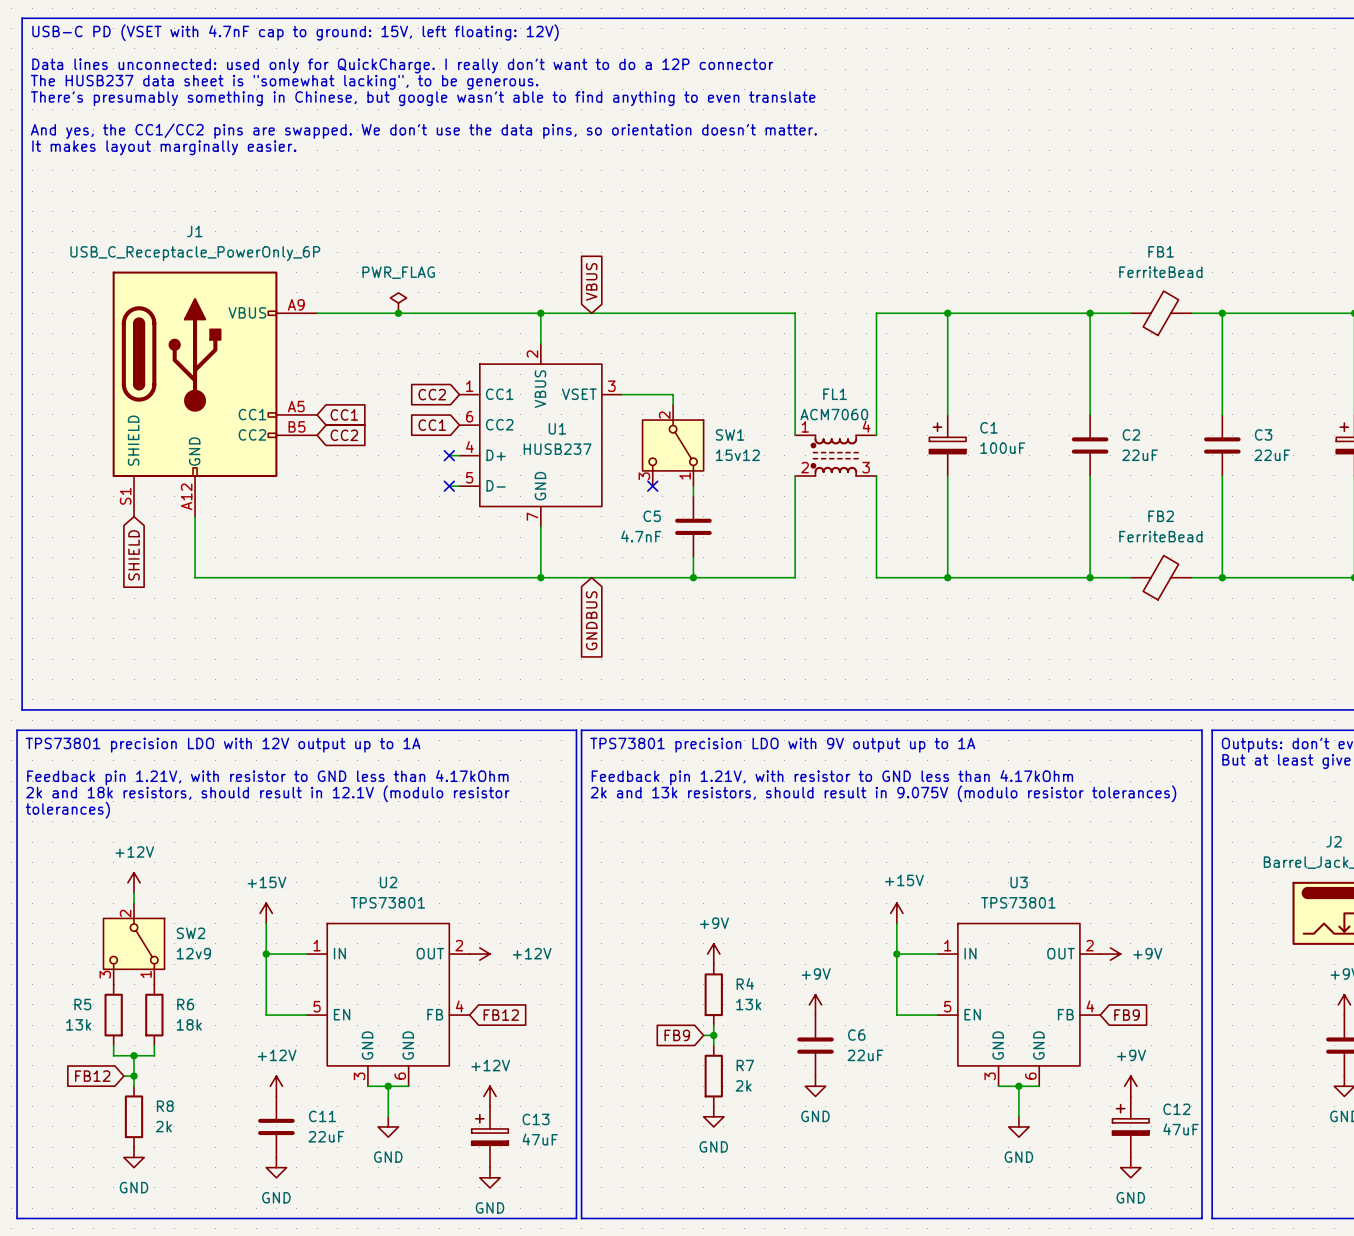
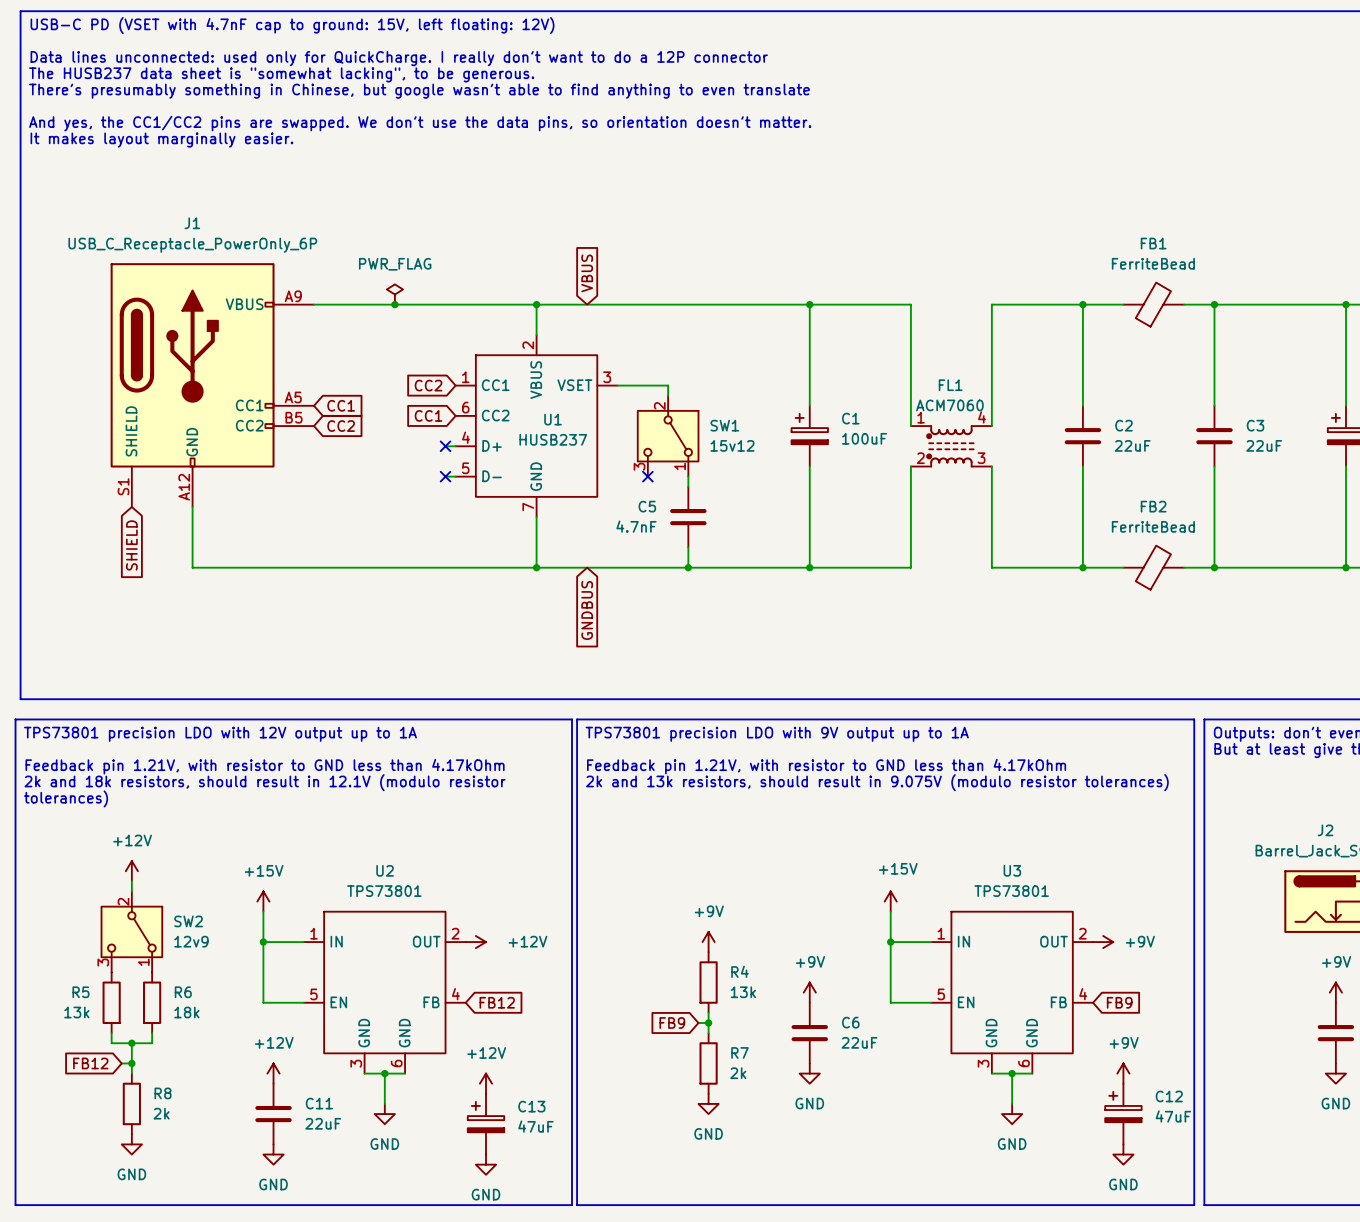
wire: (795, 313) (795, 435) -> (789, 304) (870, 304)
junction: none -> (809, 304)
wire: (876, 313) (876, 435) -> (991, 304) (991, 426)
wire: (917, 313) (998, 313) -> (910, 304) (910, 426)
wire: (947, 313) (947, 414) -> (809, 304) (809, 405)
junction: (947, 313) -> none
C1 position: (947, 445) -> (809, 436)
FL1 position: (835, 455) -> (951, 446)
wire: (795, 475) (795, 577) -> (870, 567) (789, 567)
wire: (876, 475) (876, 577) -> (991, 466) (991, 567)
wire: (947, 475) (947, 577) -> (809, 466) (809, 567)
junction: none -> (809, 567)
wire: (917, 577) (998, 577) -> (910, 567) (910, 466)
junction: (947, 577) -> none

